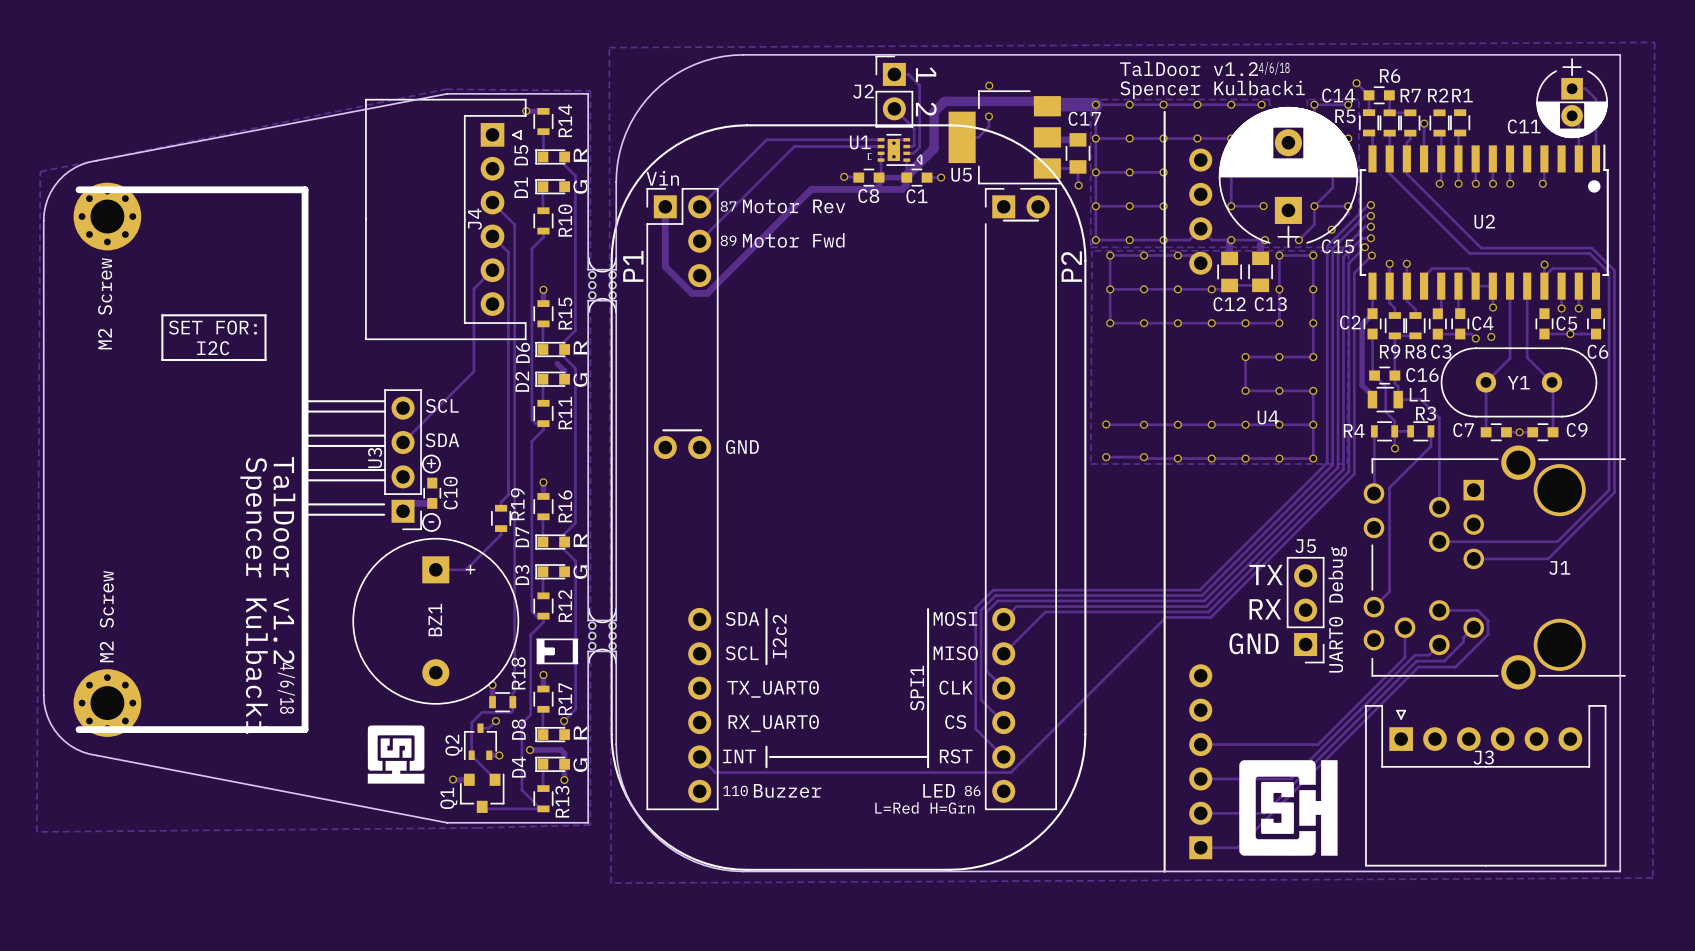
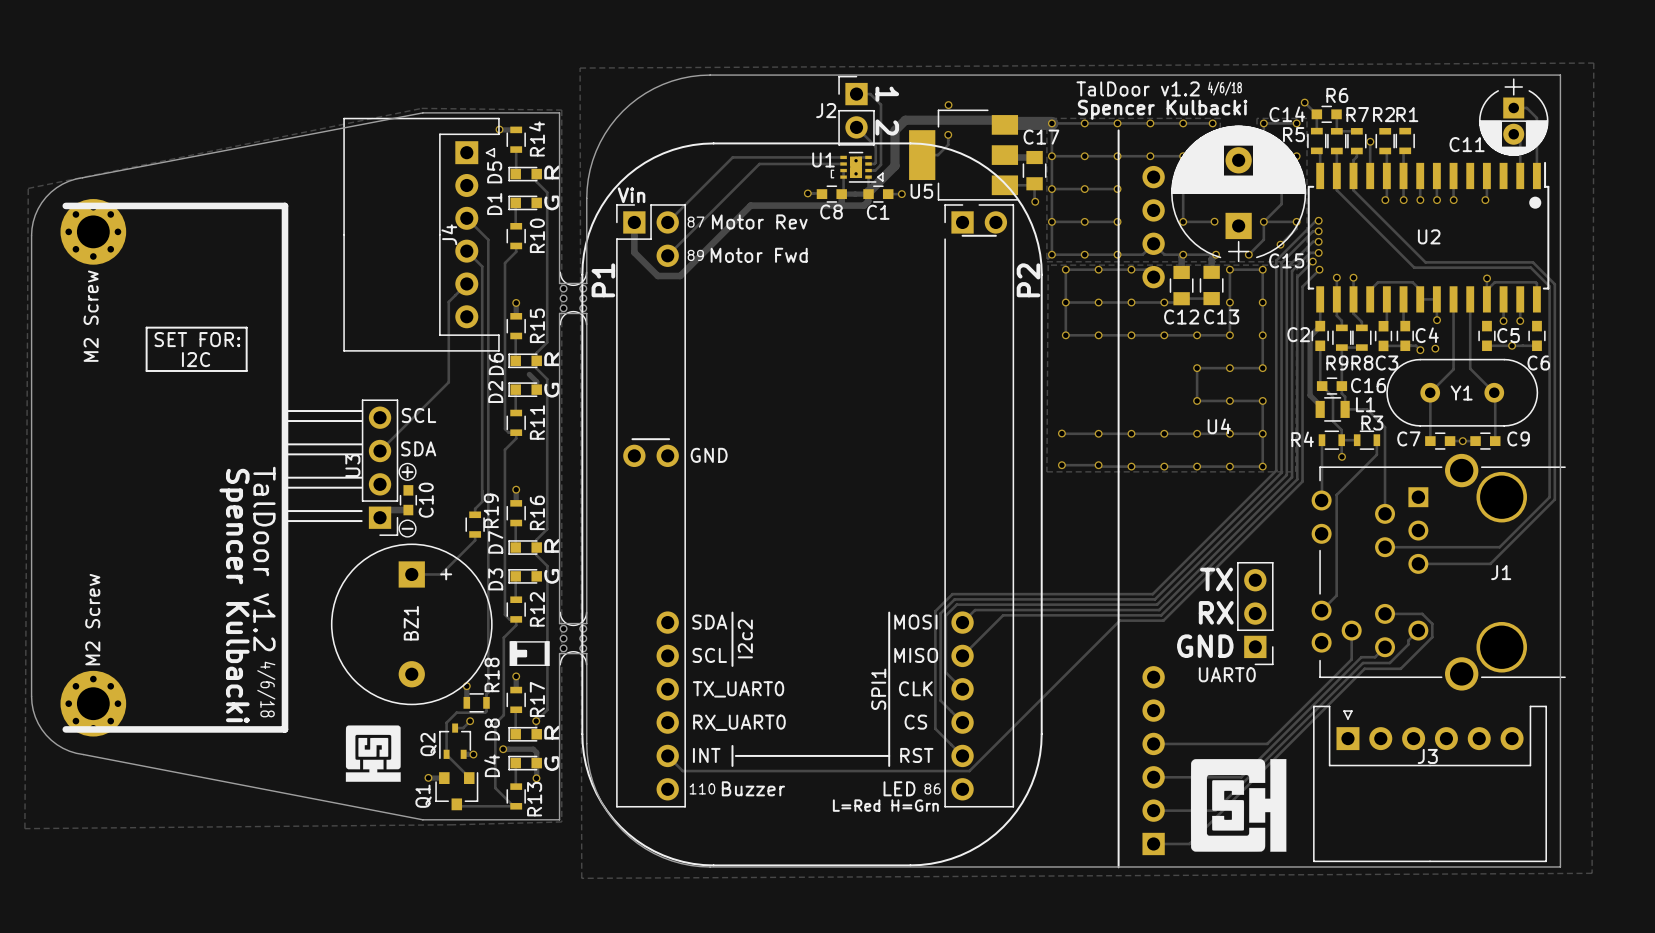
P1 footprint: [610, 124, 1087, 871] -> [581, 142, 1043, 867]
track: (811, 189) (707, 293) (692, 293) (665, 266) (665, 237) -> (775, 205) (750, 205) (680, 276) (657, 276) (634, 252)
J5 name: J5 (1305, 546) -> UART0 (1227, 674)
text: UART0 Debug (1337, 609) -> none

